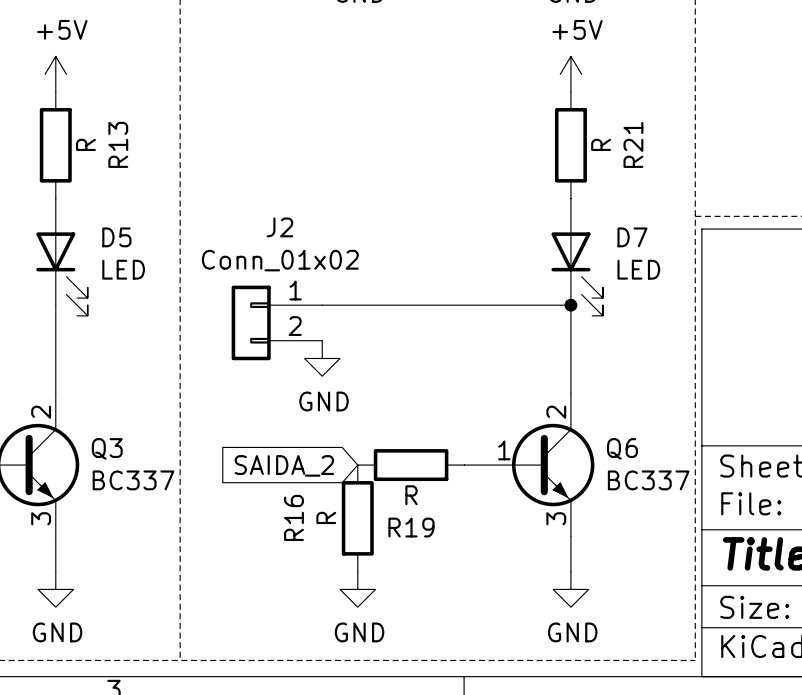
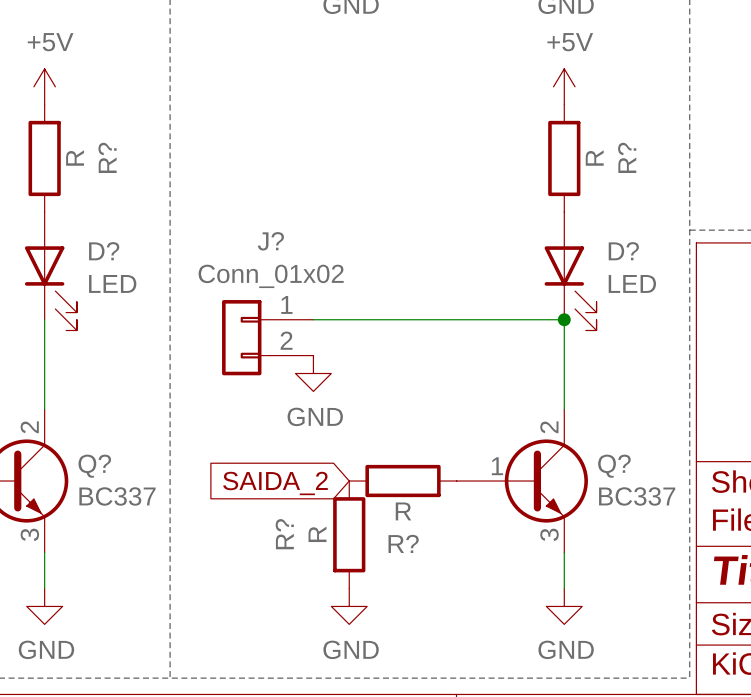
R13 name: R13 (118, 144) -> R? (107, 157)
R21 name: R21 (633, 144) -> R? (627, 157)
J2 name: J2 (279, 227) -> J? (270, 241)
D5 name: D5 (116, 237) -> D? (104, 251)
D7 name: D7 (632, 237) -> D? (623, 251)
Q3 name: Q3 (107, 448) -> Q? (94, 466)
Q6 name: Q6 (622, 448) -> Q? (614, 466)
R16 name: R16 (293, 517) -> R? (284, 534)
R19 name: R19 (411, 527) -> R? (403, 543)

